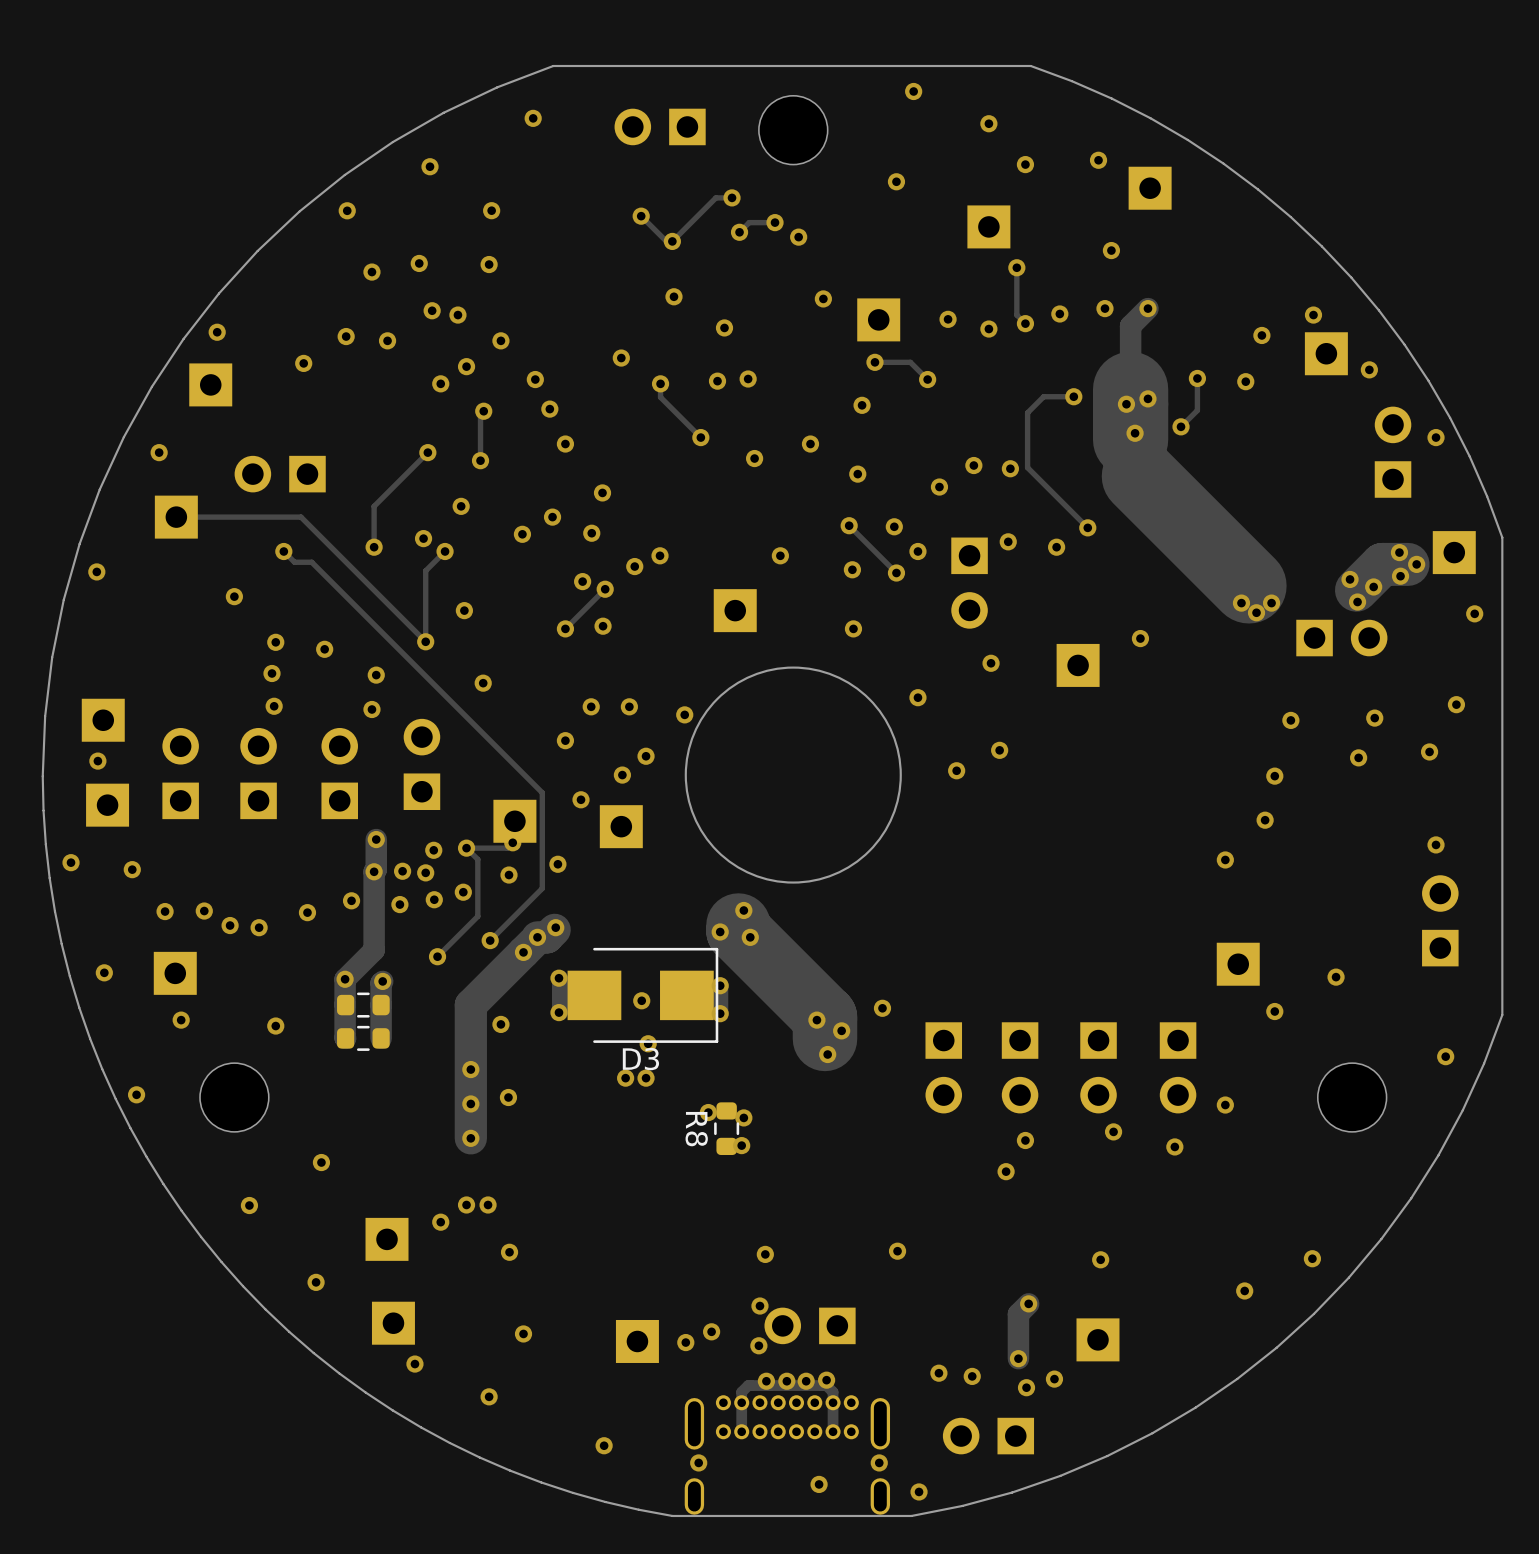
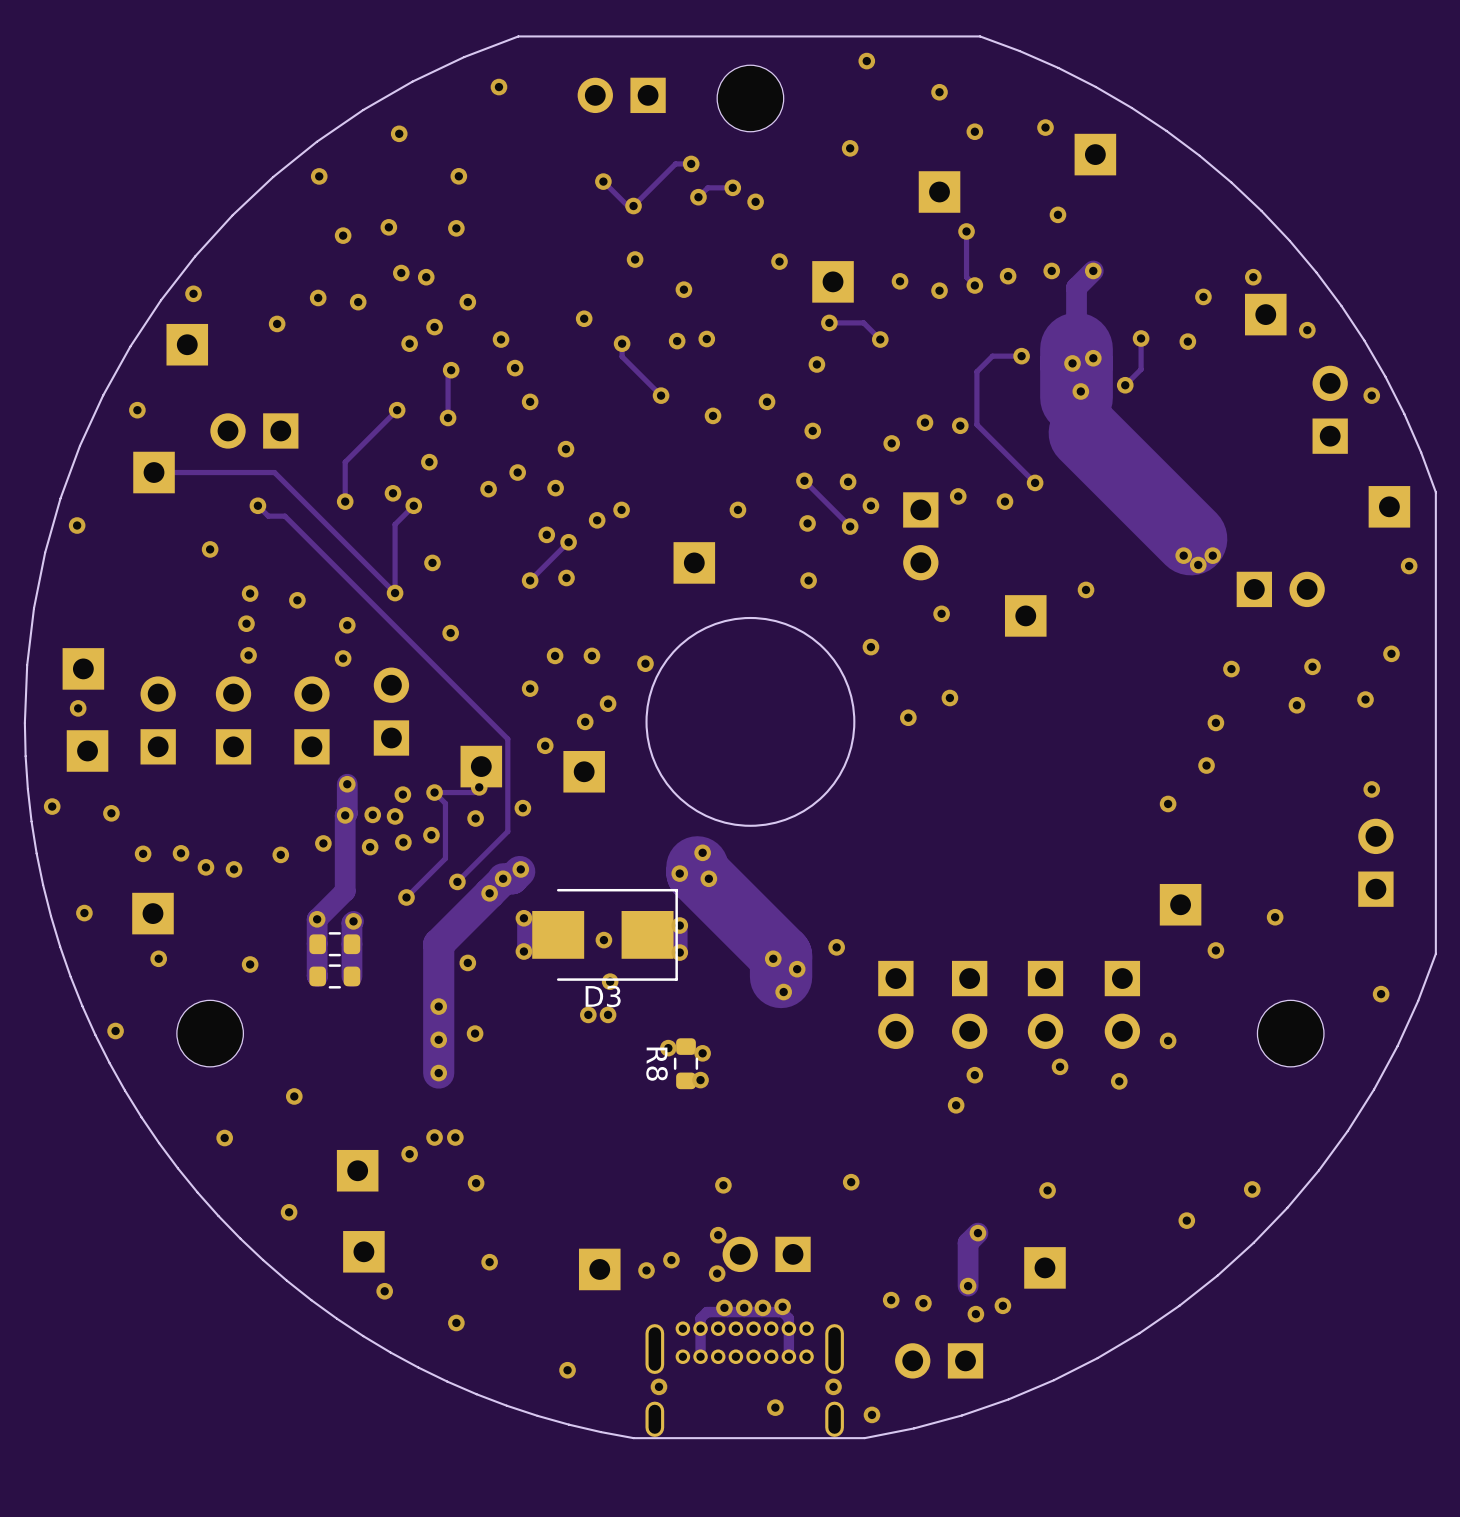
via: (1399, 552) -> none
track: (1408, 564) (1382, 564) (1356, 590) -> none
via: (1416, 564) -> none
via: (1400, 576) -> none
via: (1350, 579) -> none
via: (1373, 586) -> none
via: (1357, 602) -> none

